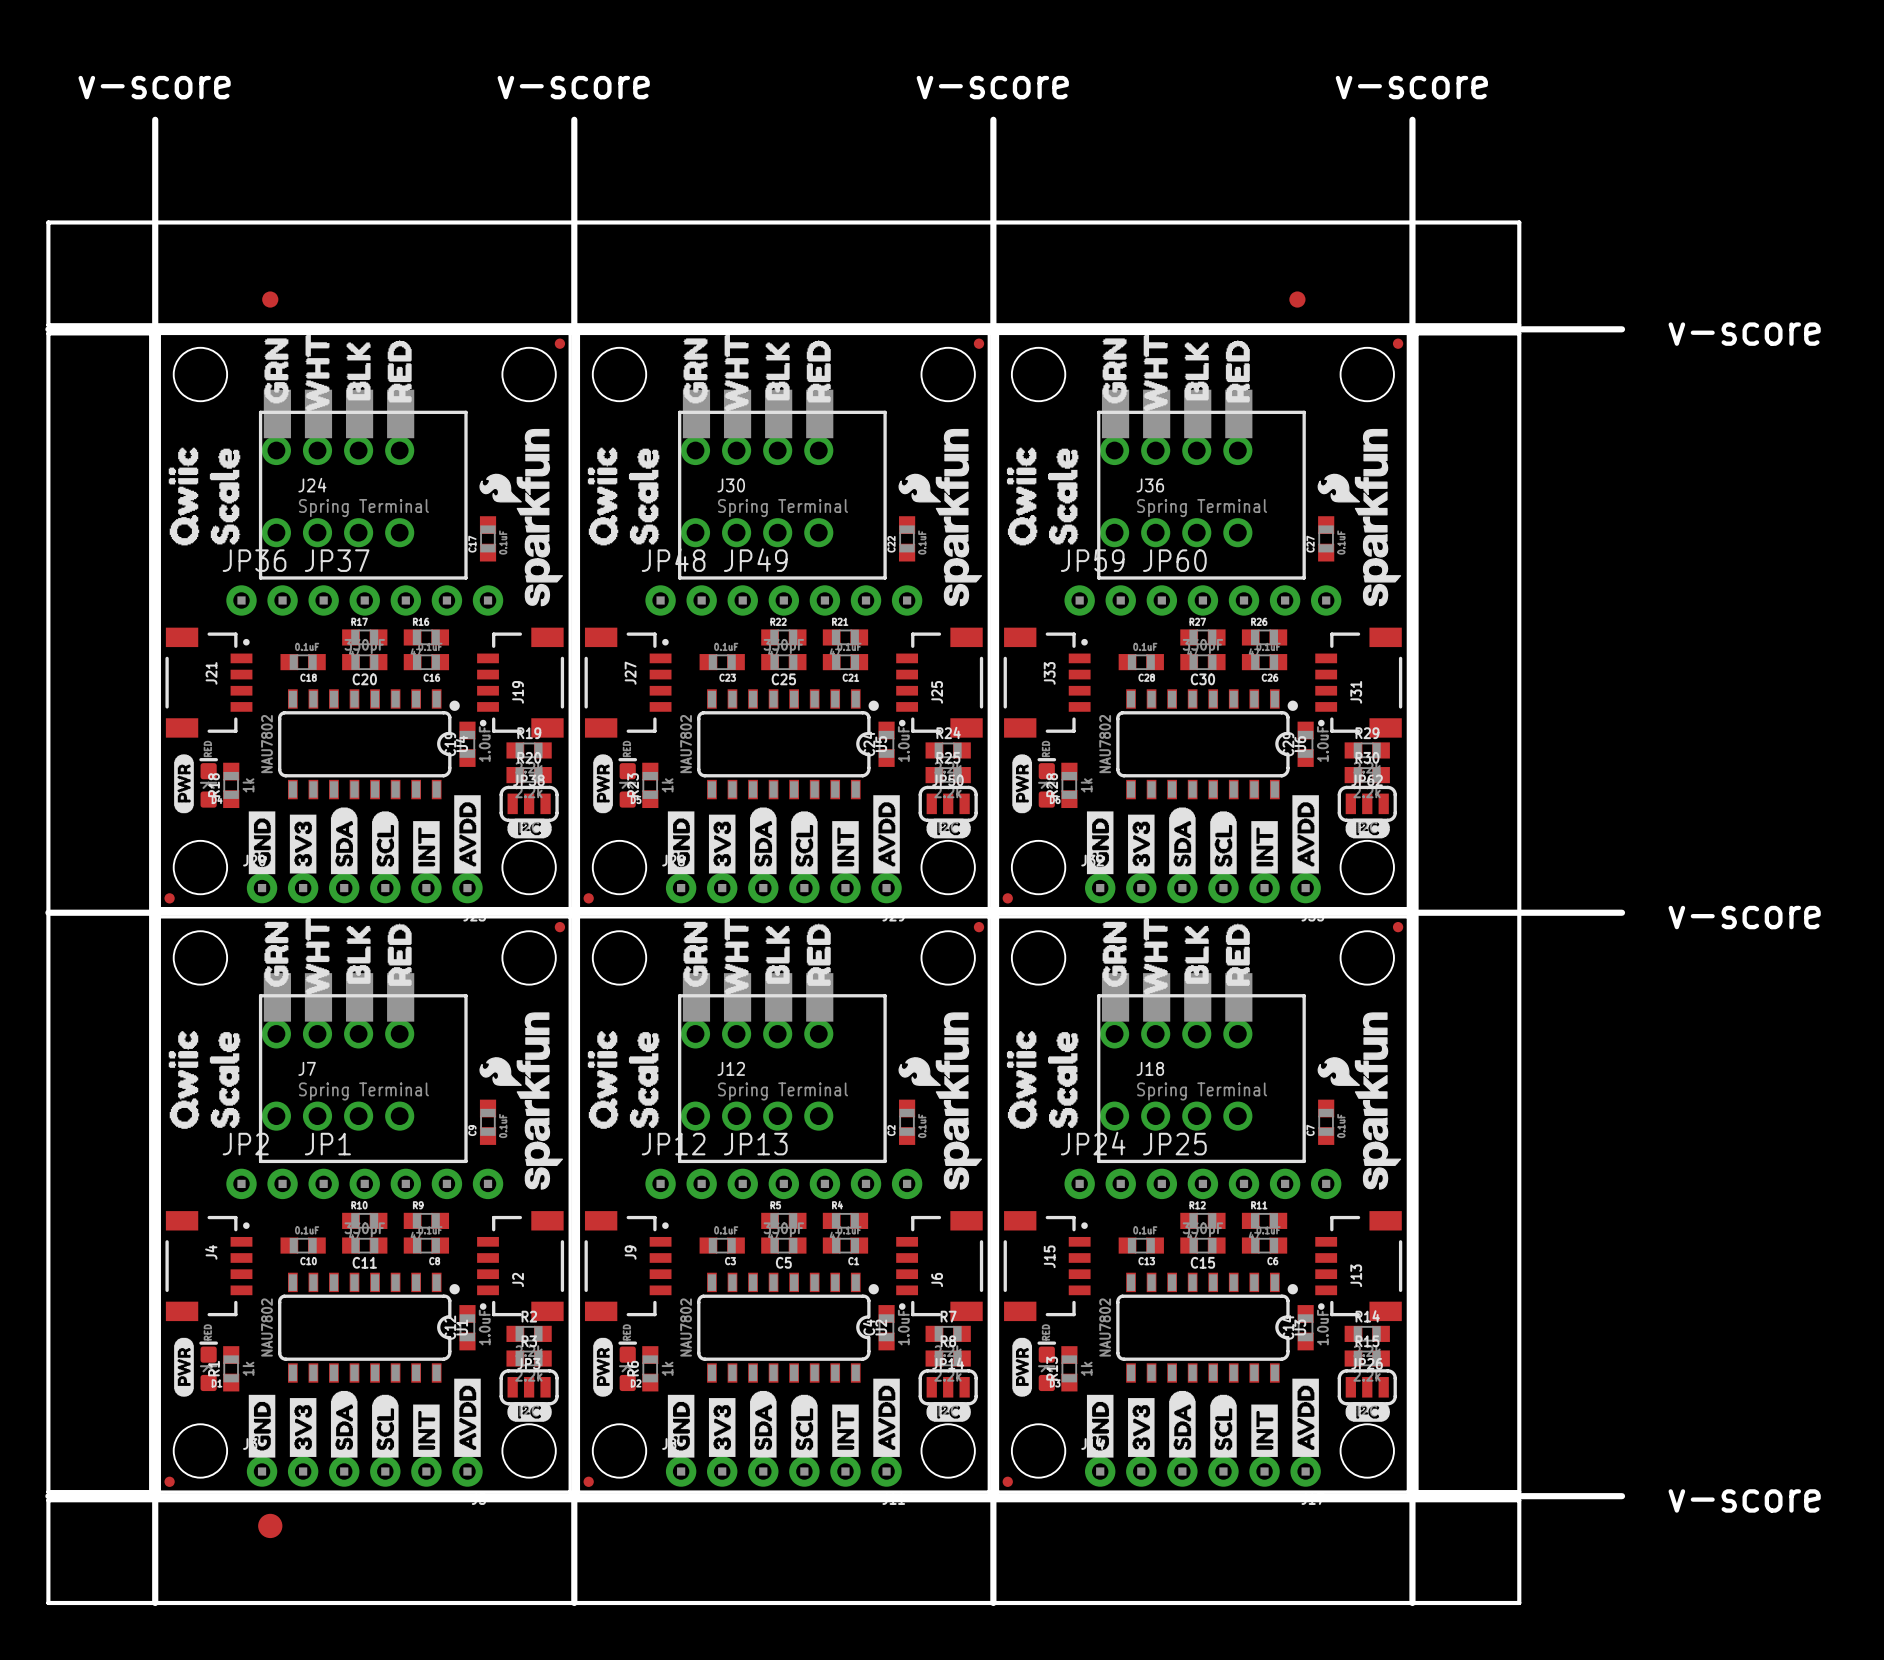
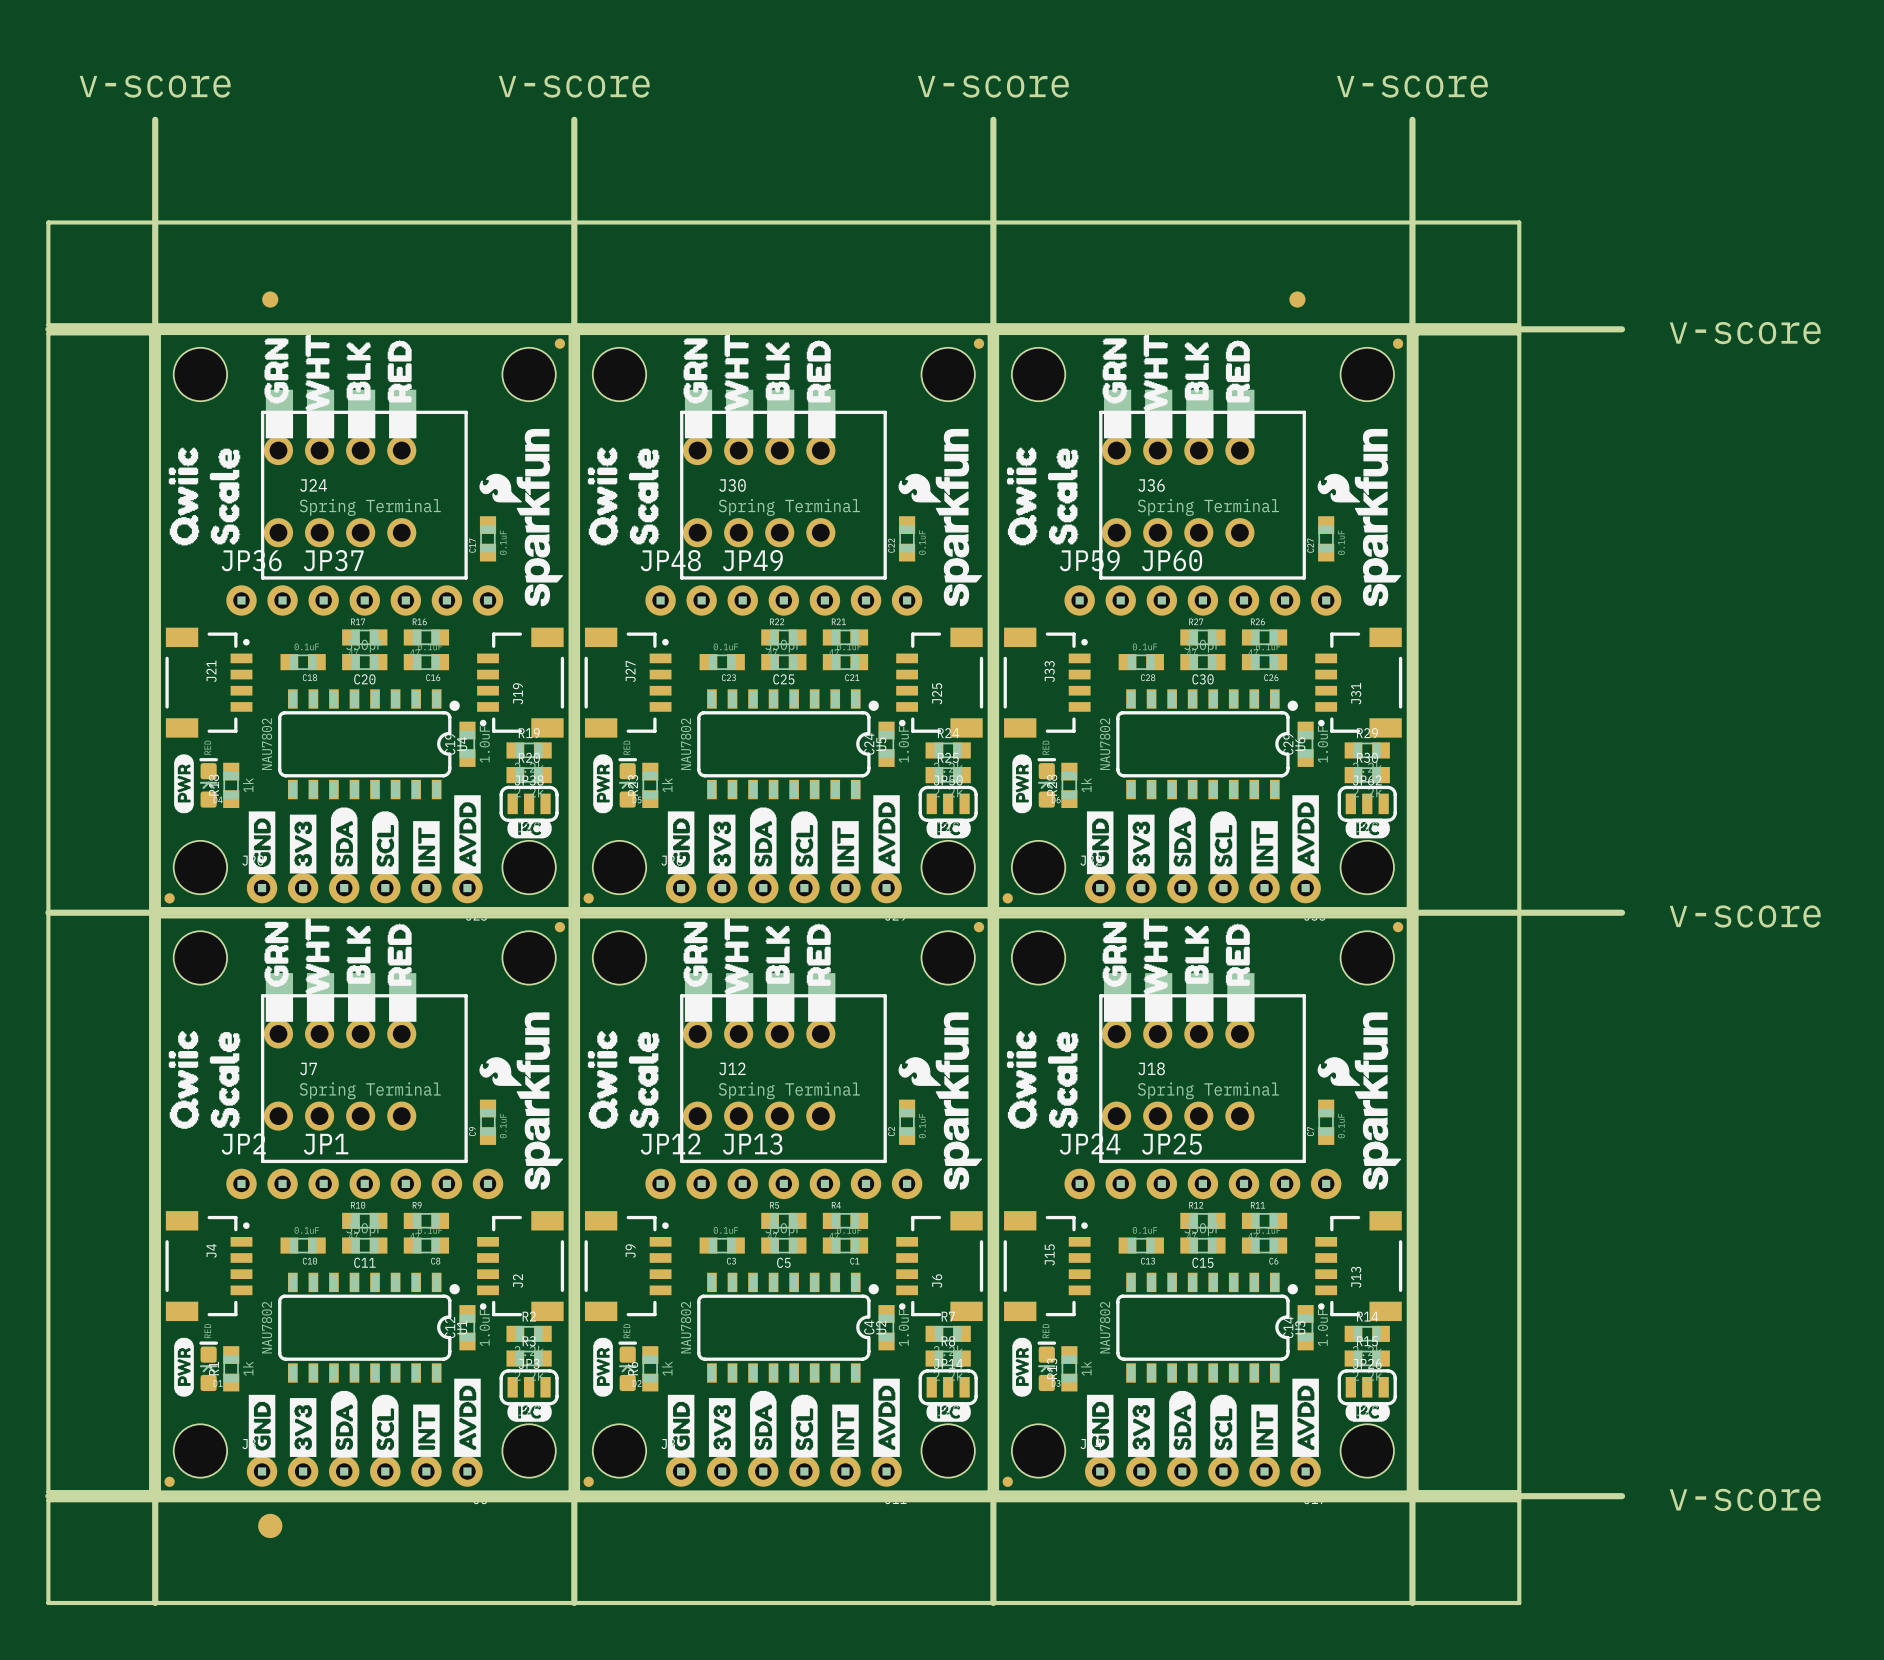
J24 footprint: [258, 389, 468, 580] -> [260, 389, 468, 580]
J30 footprint: [678, 389, 887, 580] -> [680, 389, 887, 580]
J36 footprint: [1097, 389, 1306, 580] -> [1099, 389, 1306, 580]
J7 footprint: [258, 973, 468, 1164] -> [260, 973, 468, 1164]
J12 footprint: [678, 973, 887, 1164] -> [680, 973, 887, 1164]
J18 footprint: [1097, 973, 1306, 1164] -> [1099, 973, 1306, 1164]

